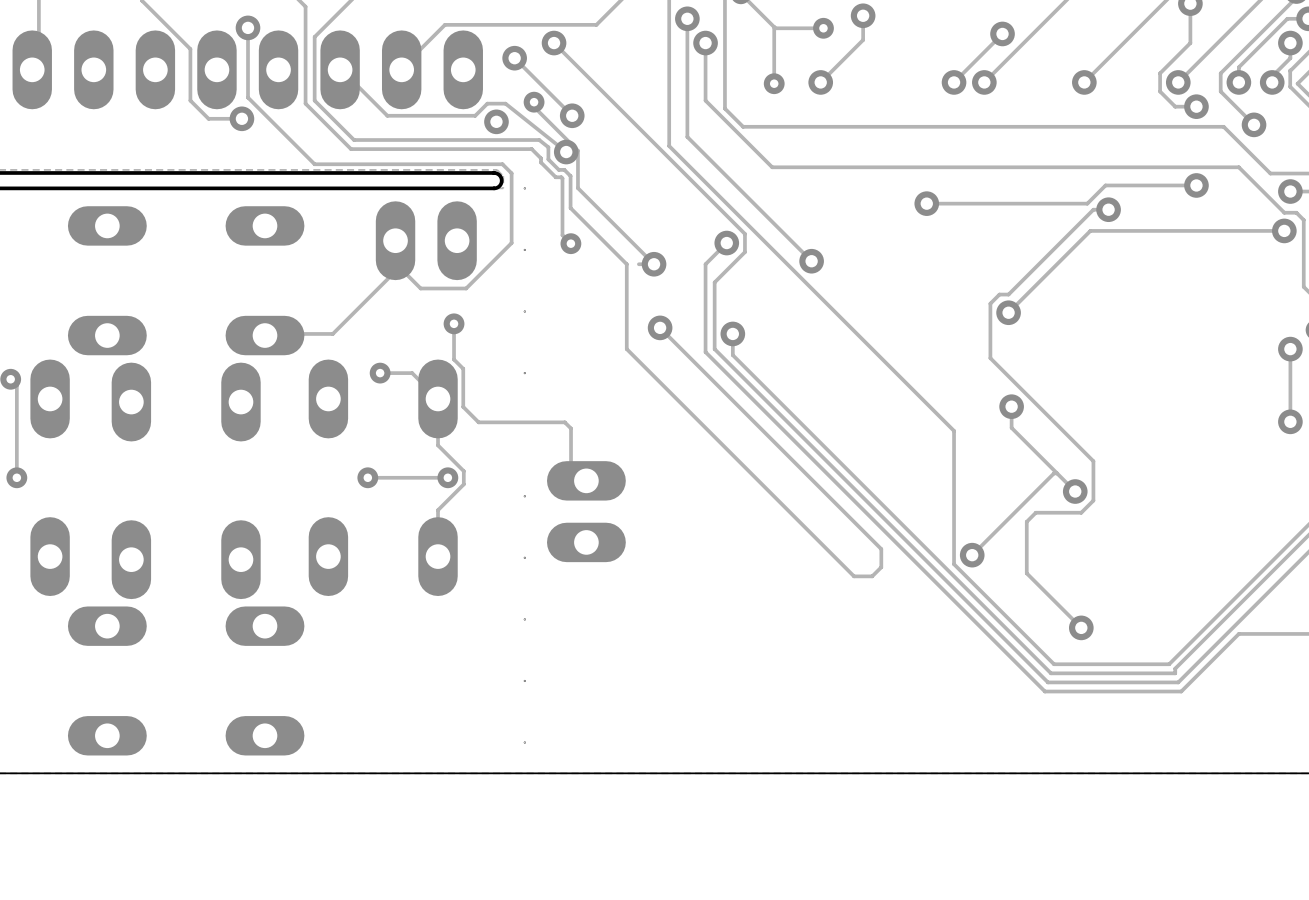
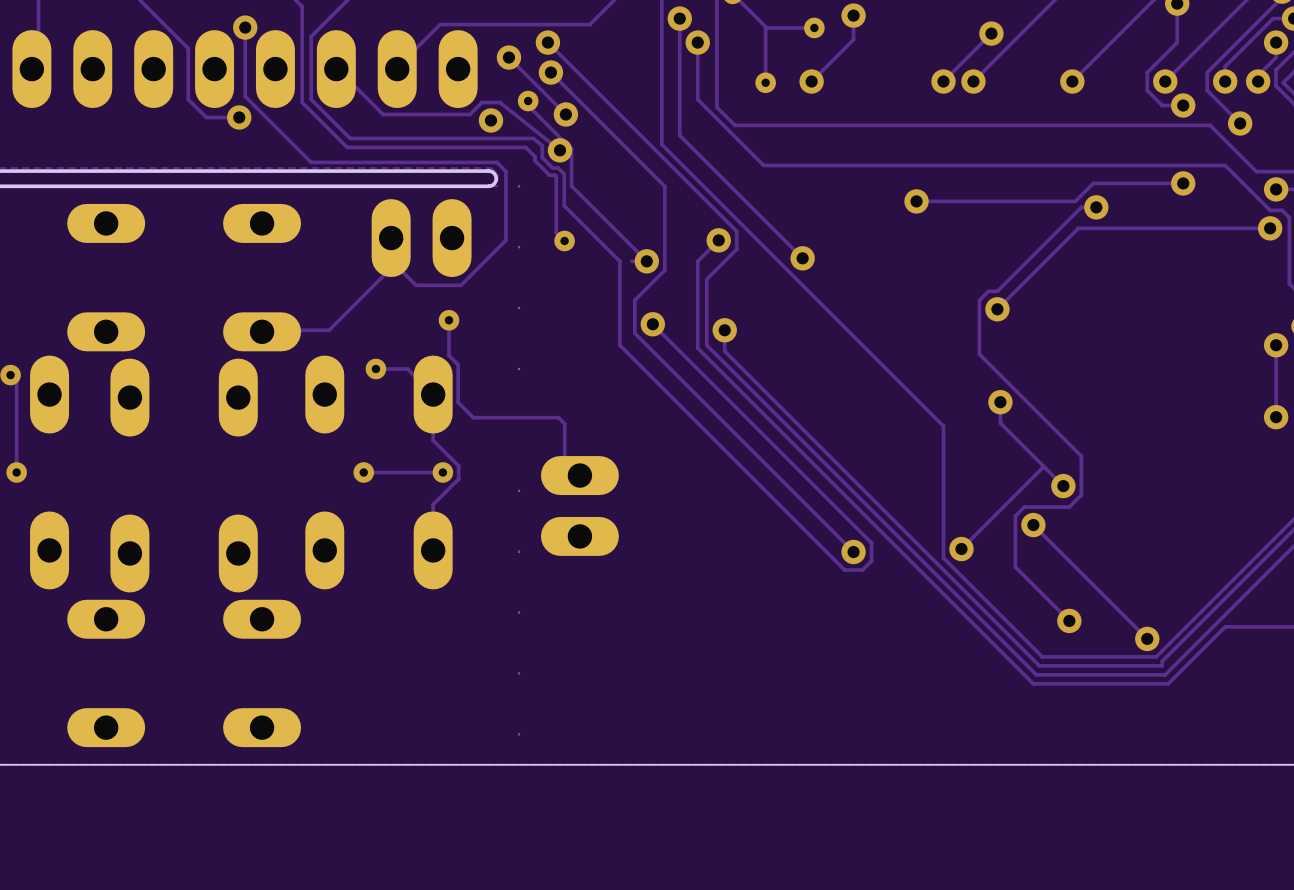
track: none -> (550, 72) (664, 186) (664, 270) (634, 300) (634, 333) (853, 552)
via: none -> (550, 72)
track: none -> (1033, 525) (1147, 638)
via: none -> (1033, 525)
via: none -> (853, 552)
via: none -> (1147, 638)

